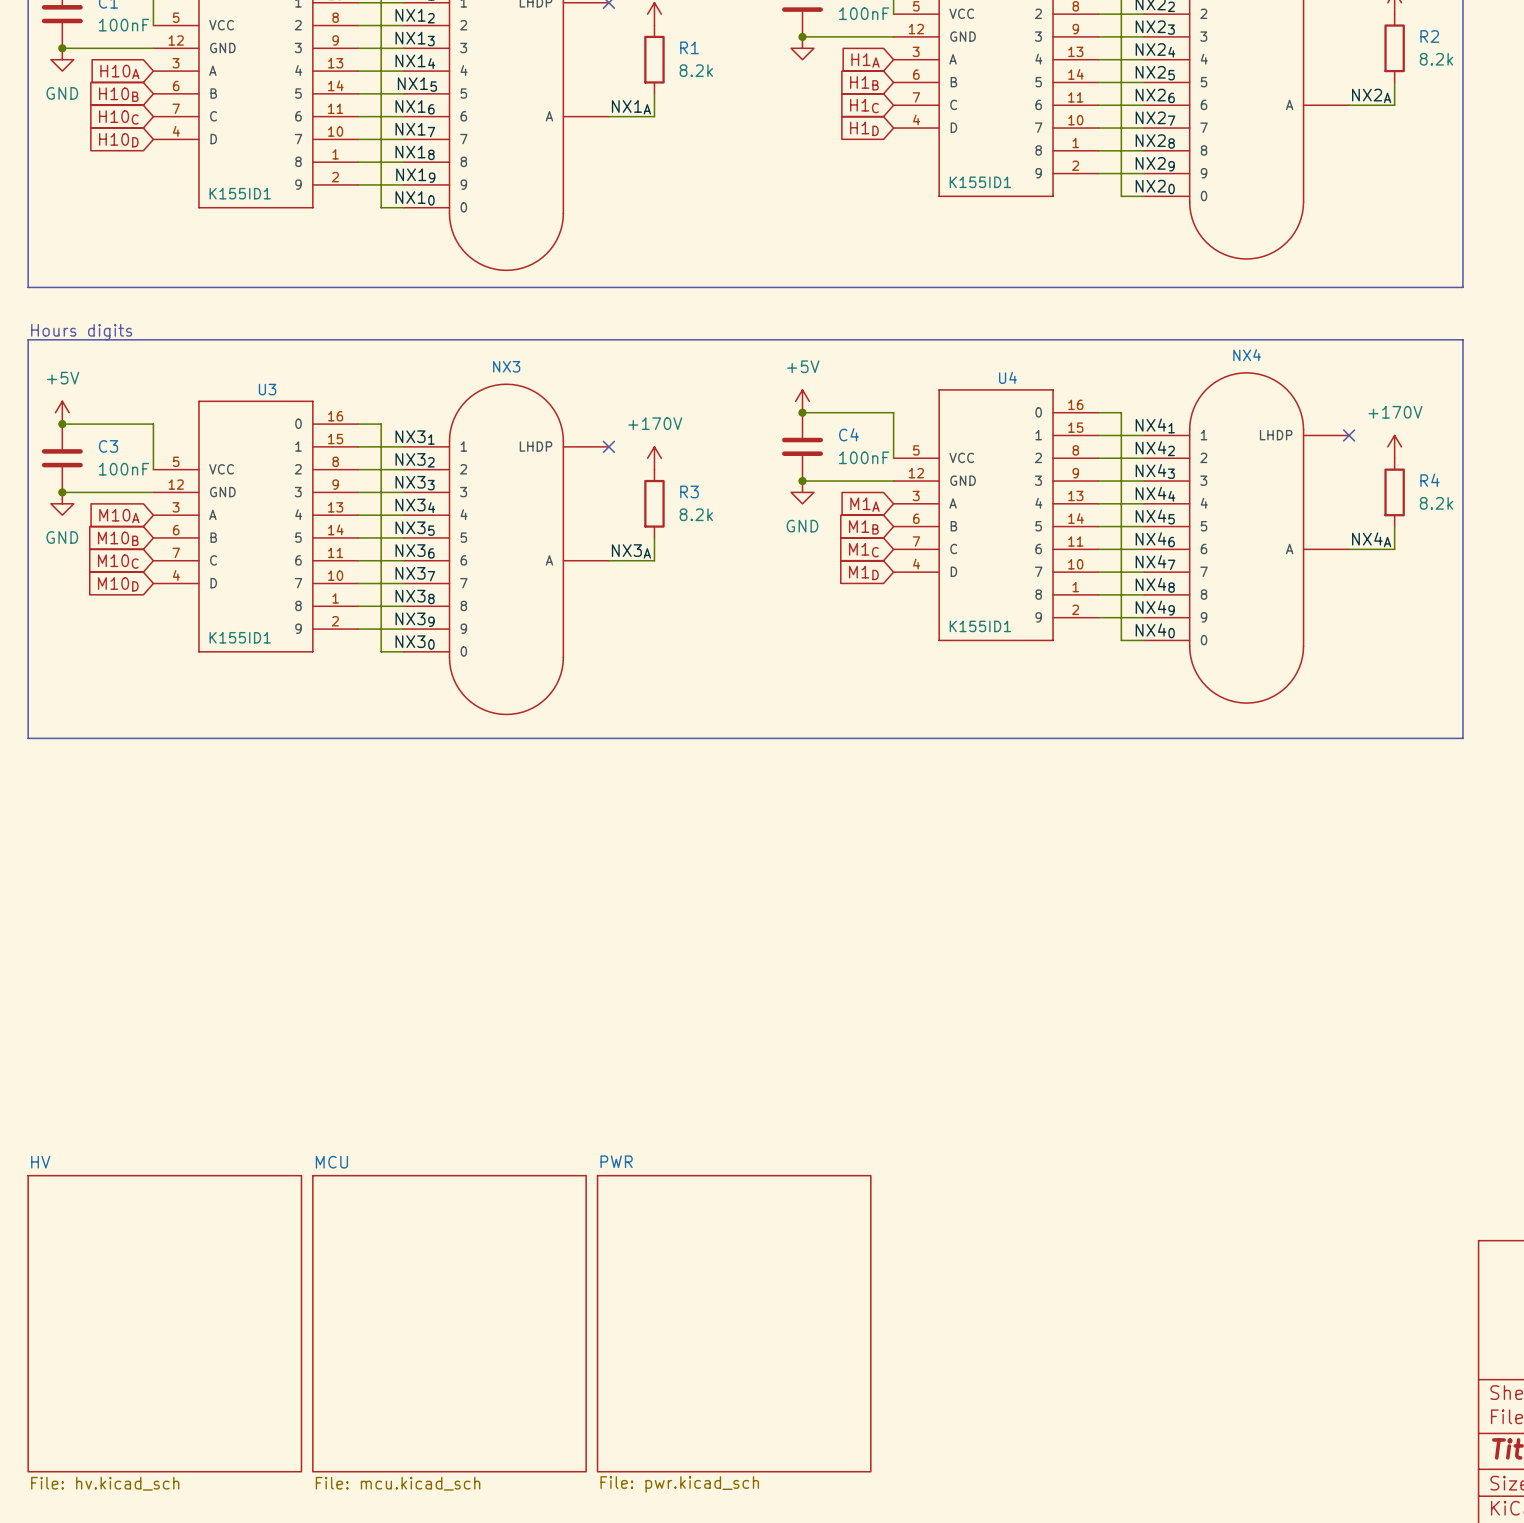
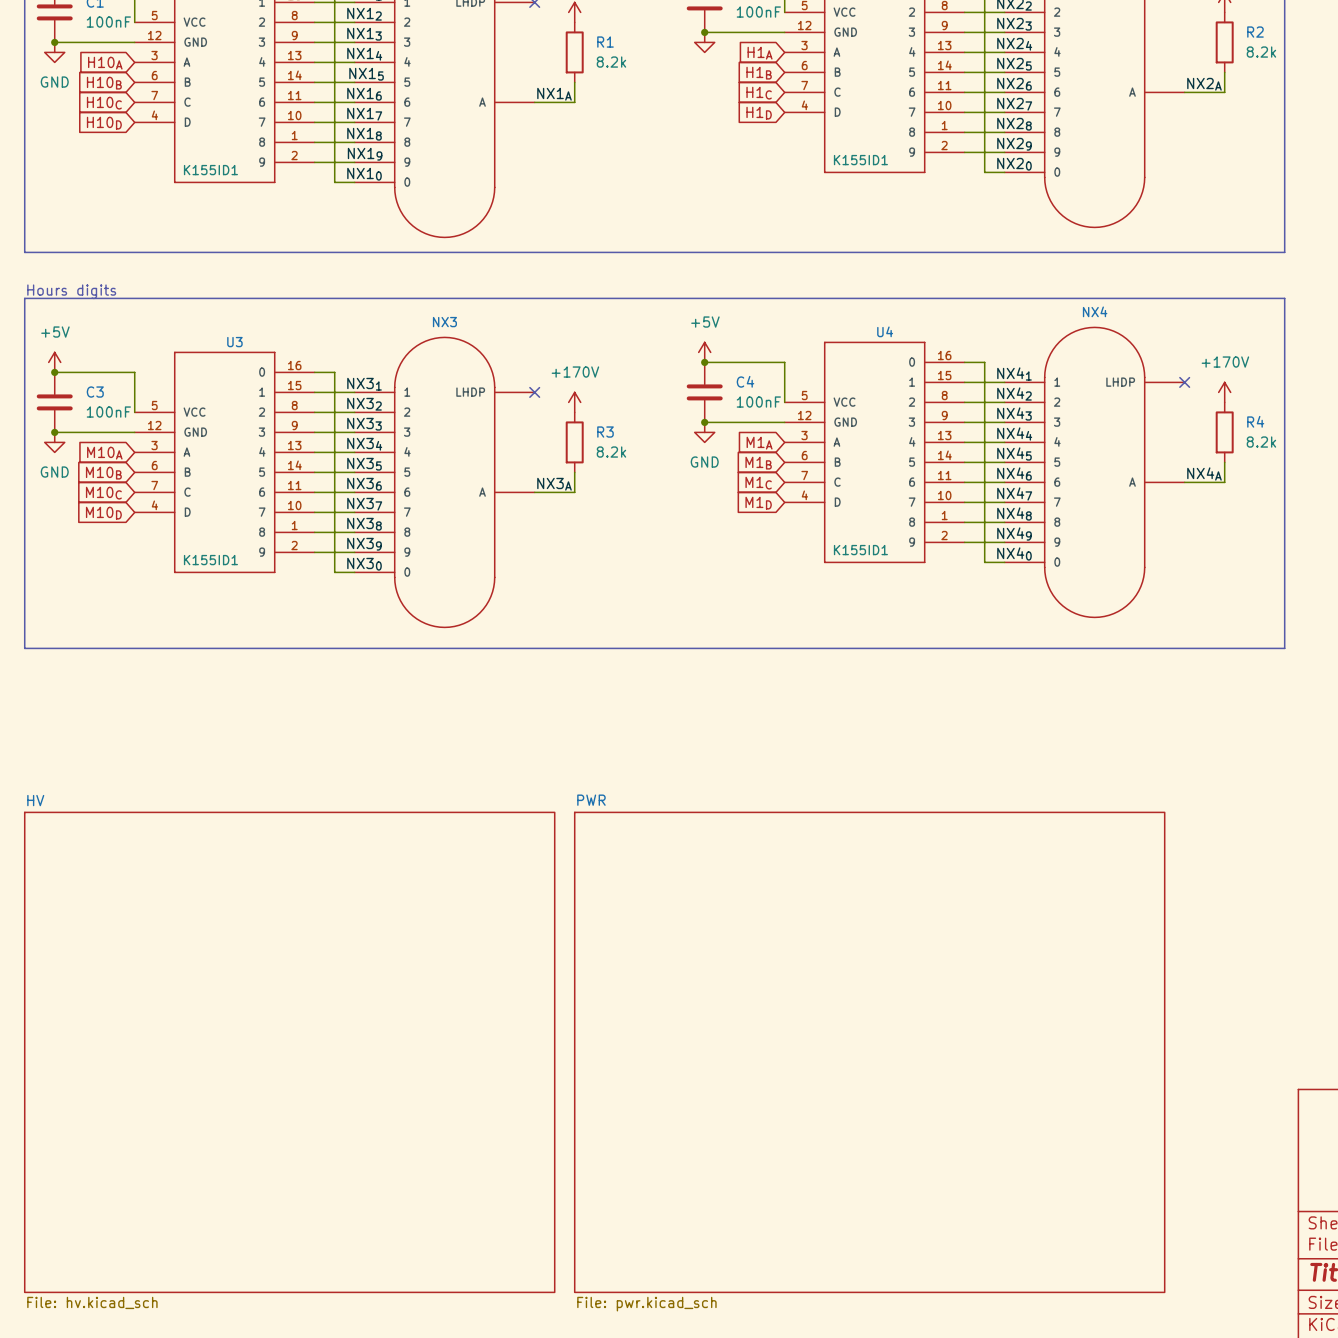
sheet HV: none -> File: hv.kicad_sch (289, 1052)
sheet PWR: none -> File: pwr.kicad_sch (869, 1052)
sheet HV: File: hv.kicad_sch (164, 1323) -> none
sheet MCU: File: mcu.kicad_sch (449, 1323) -> none
sheet PWR: File: pwr.kicad_sch (734, 1323) -> none

